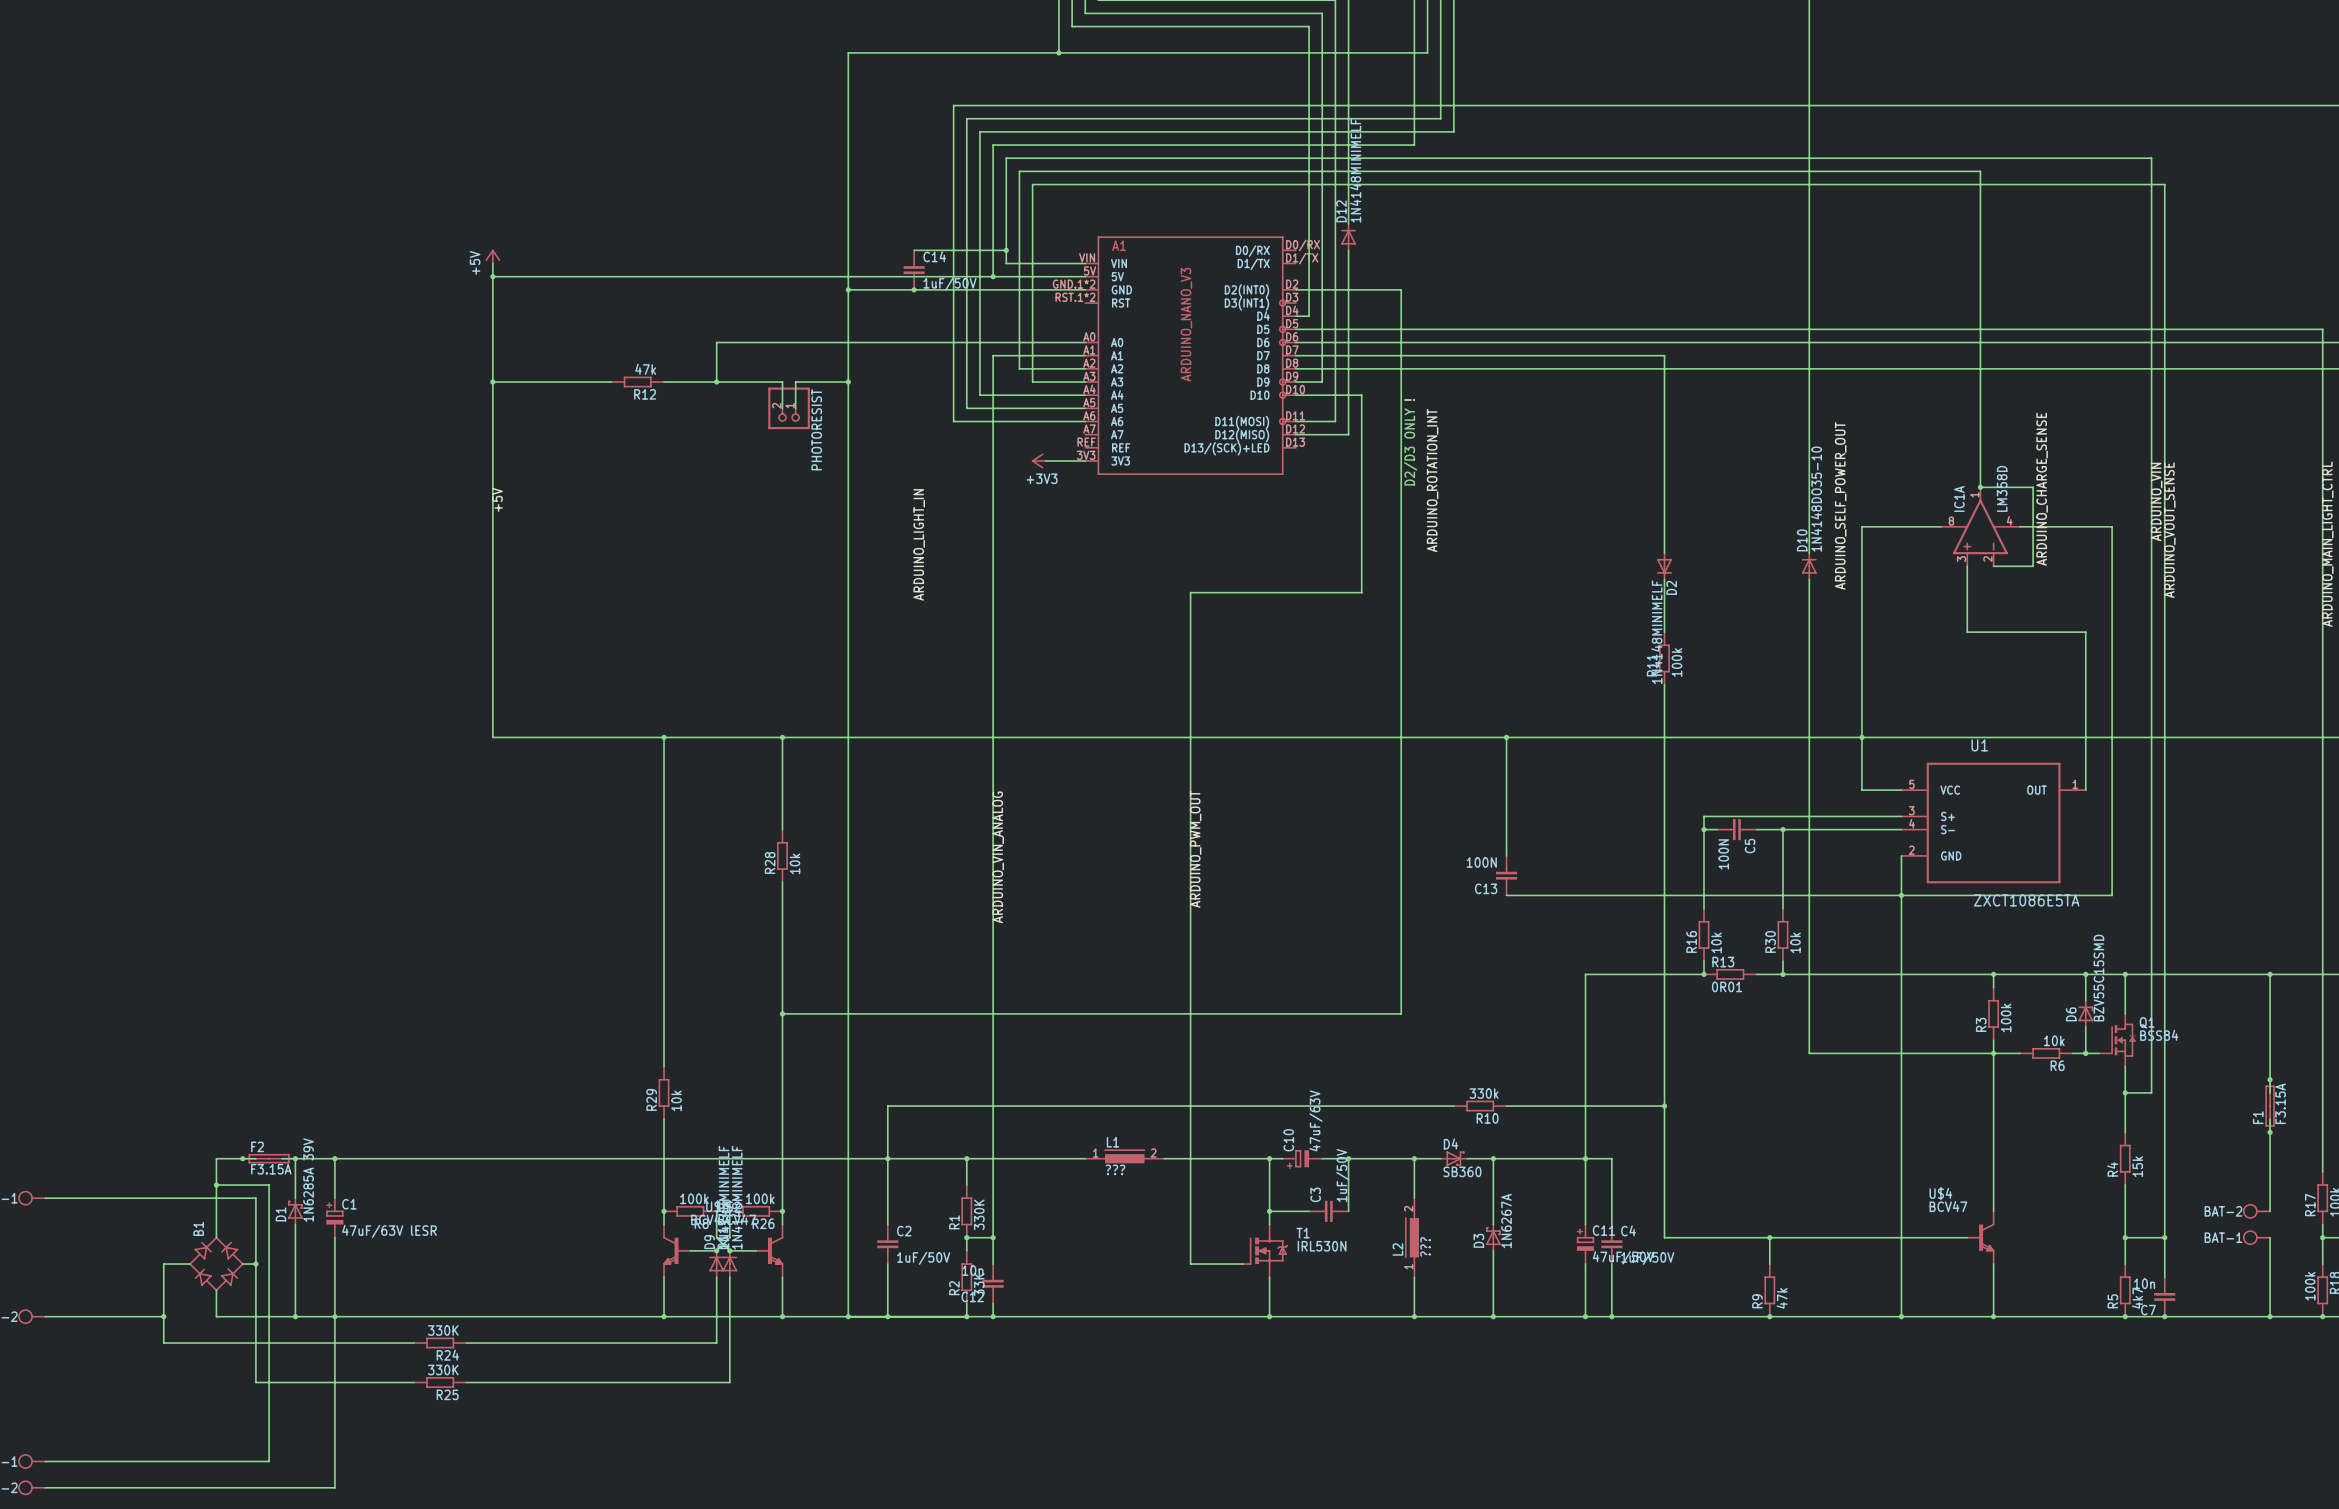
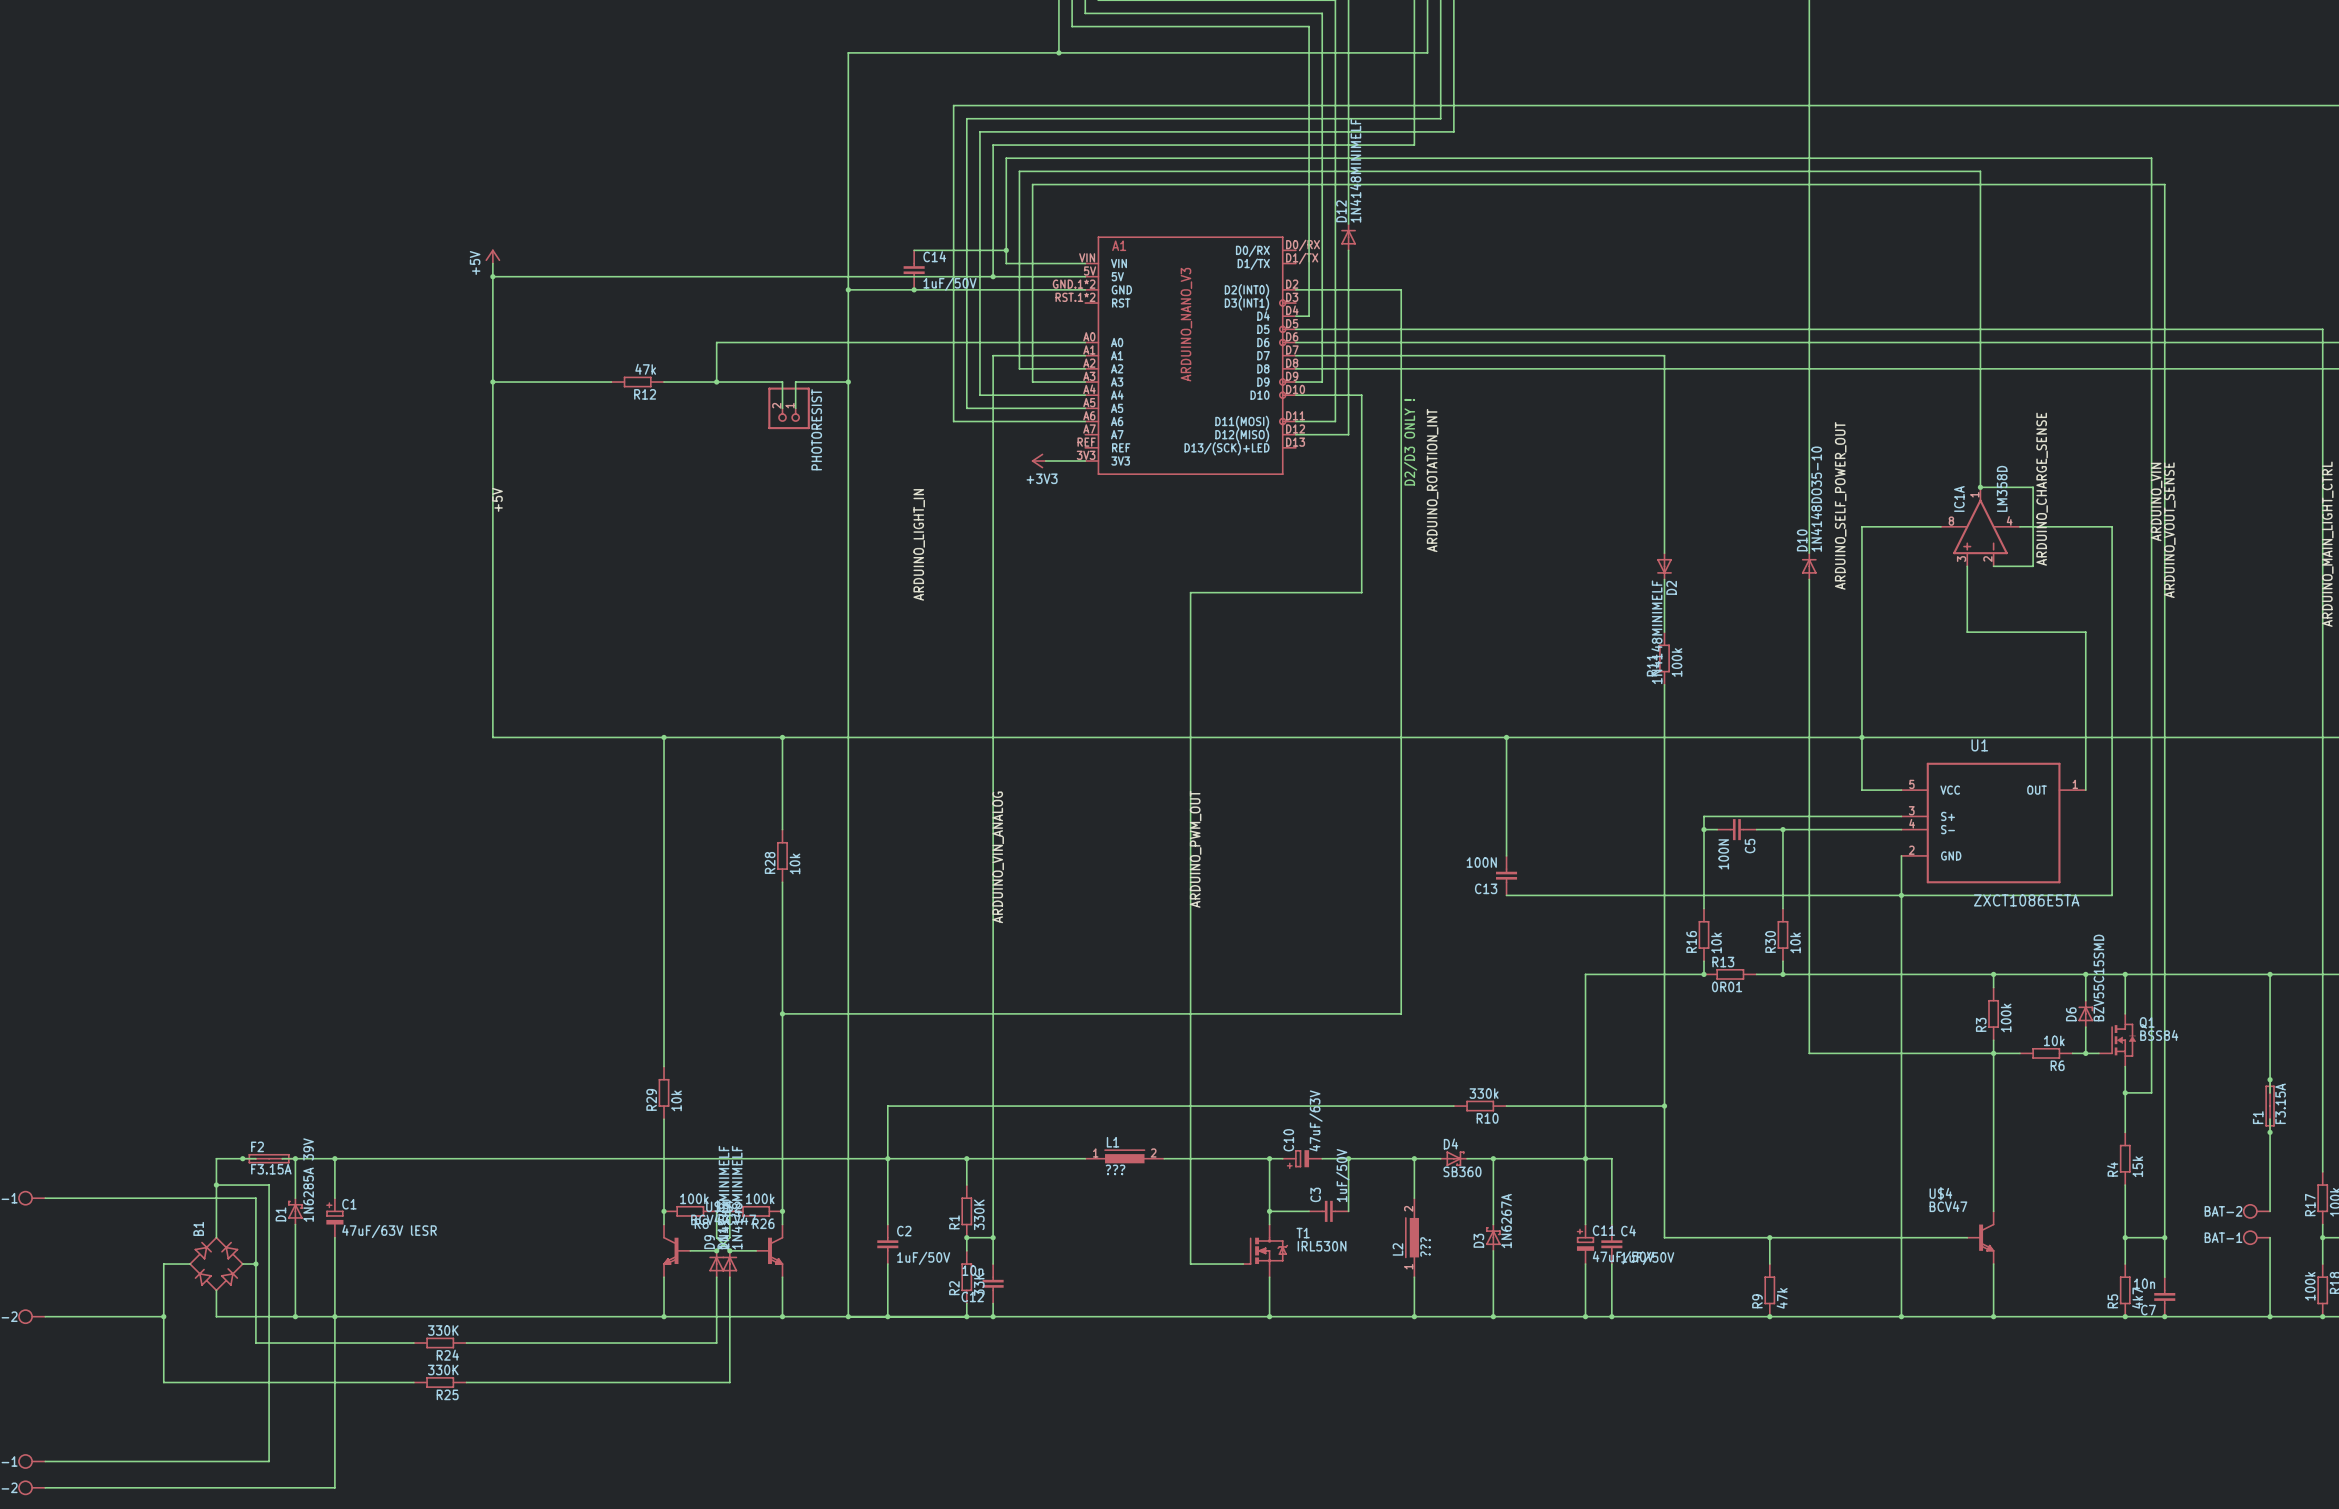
wire: (163, 1343) (255, 1343) (255, 1382) -> (163, 1343) (163, 1382) (255, 1382)

